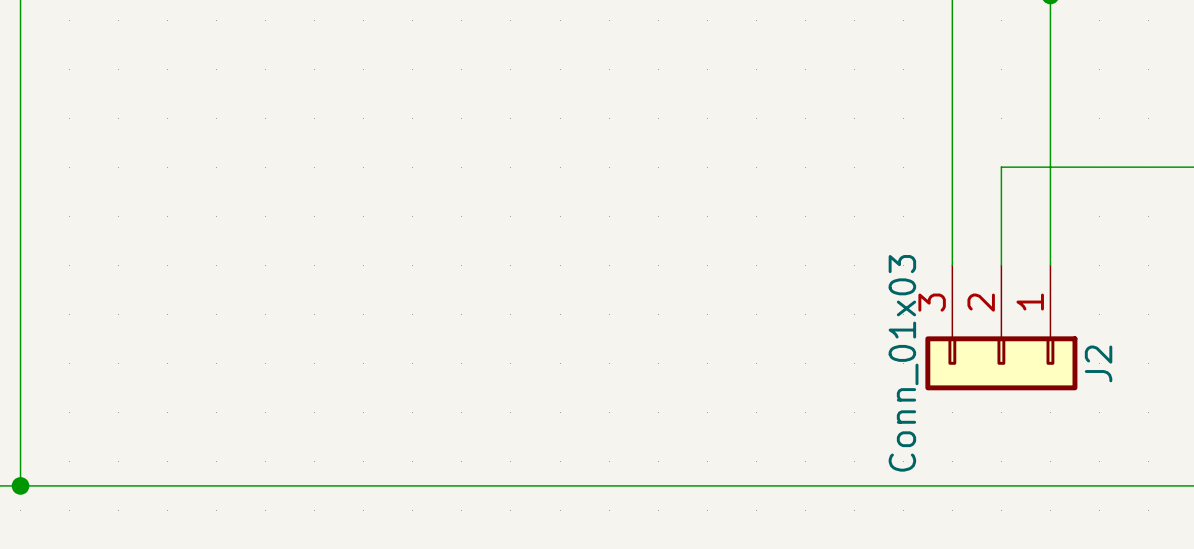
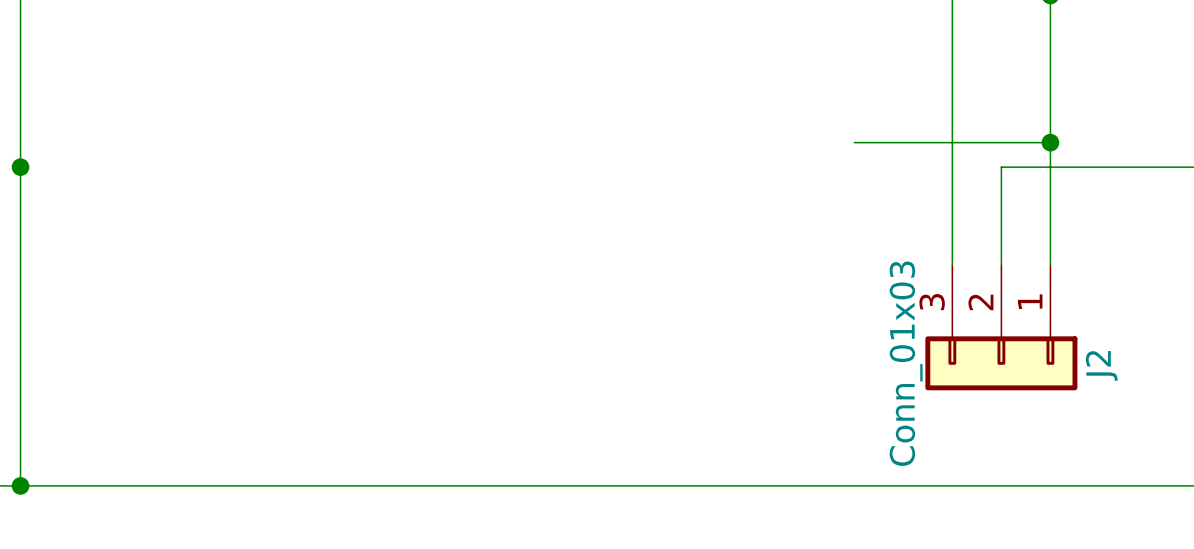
wire: none -> (854, 142) (1050, 142)
junction: none -> (1050, 142)
junction: none -> (20, 167)

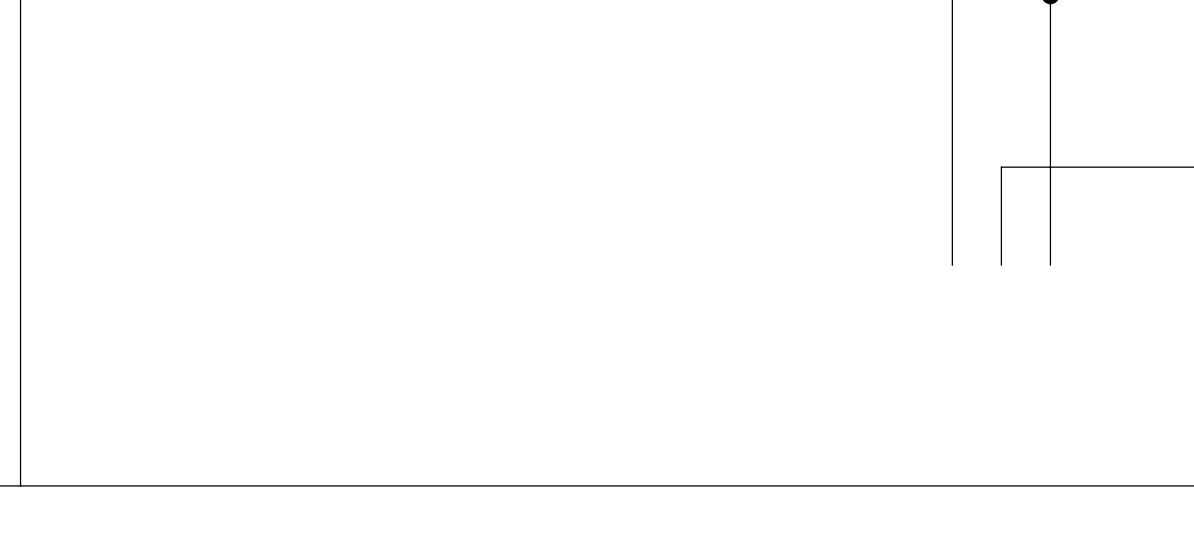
wire: (854, 142) (1050, 142) -> none
junction: (1050, 142) -> none
junction: (20, 167) -> none
J2: Conn_01x03 (1001, 327) -> none
junction: (20, 485) -> none

